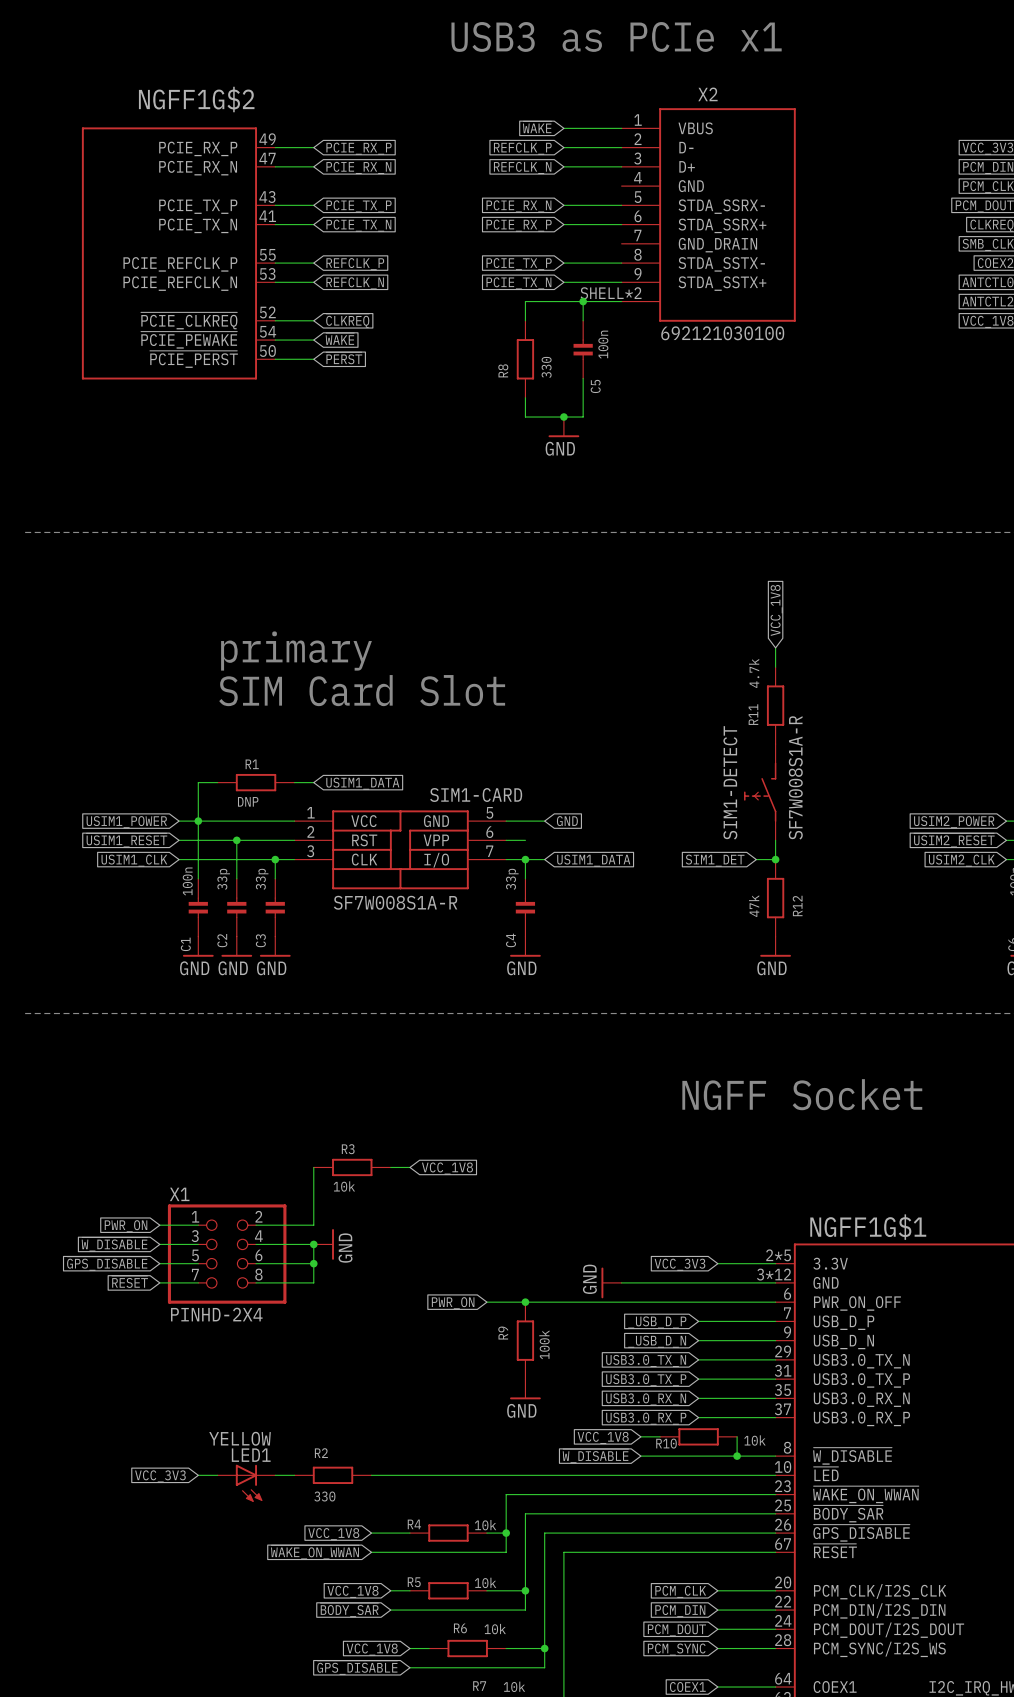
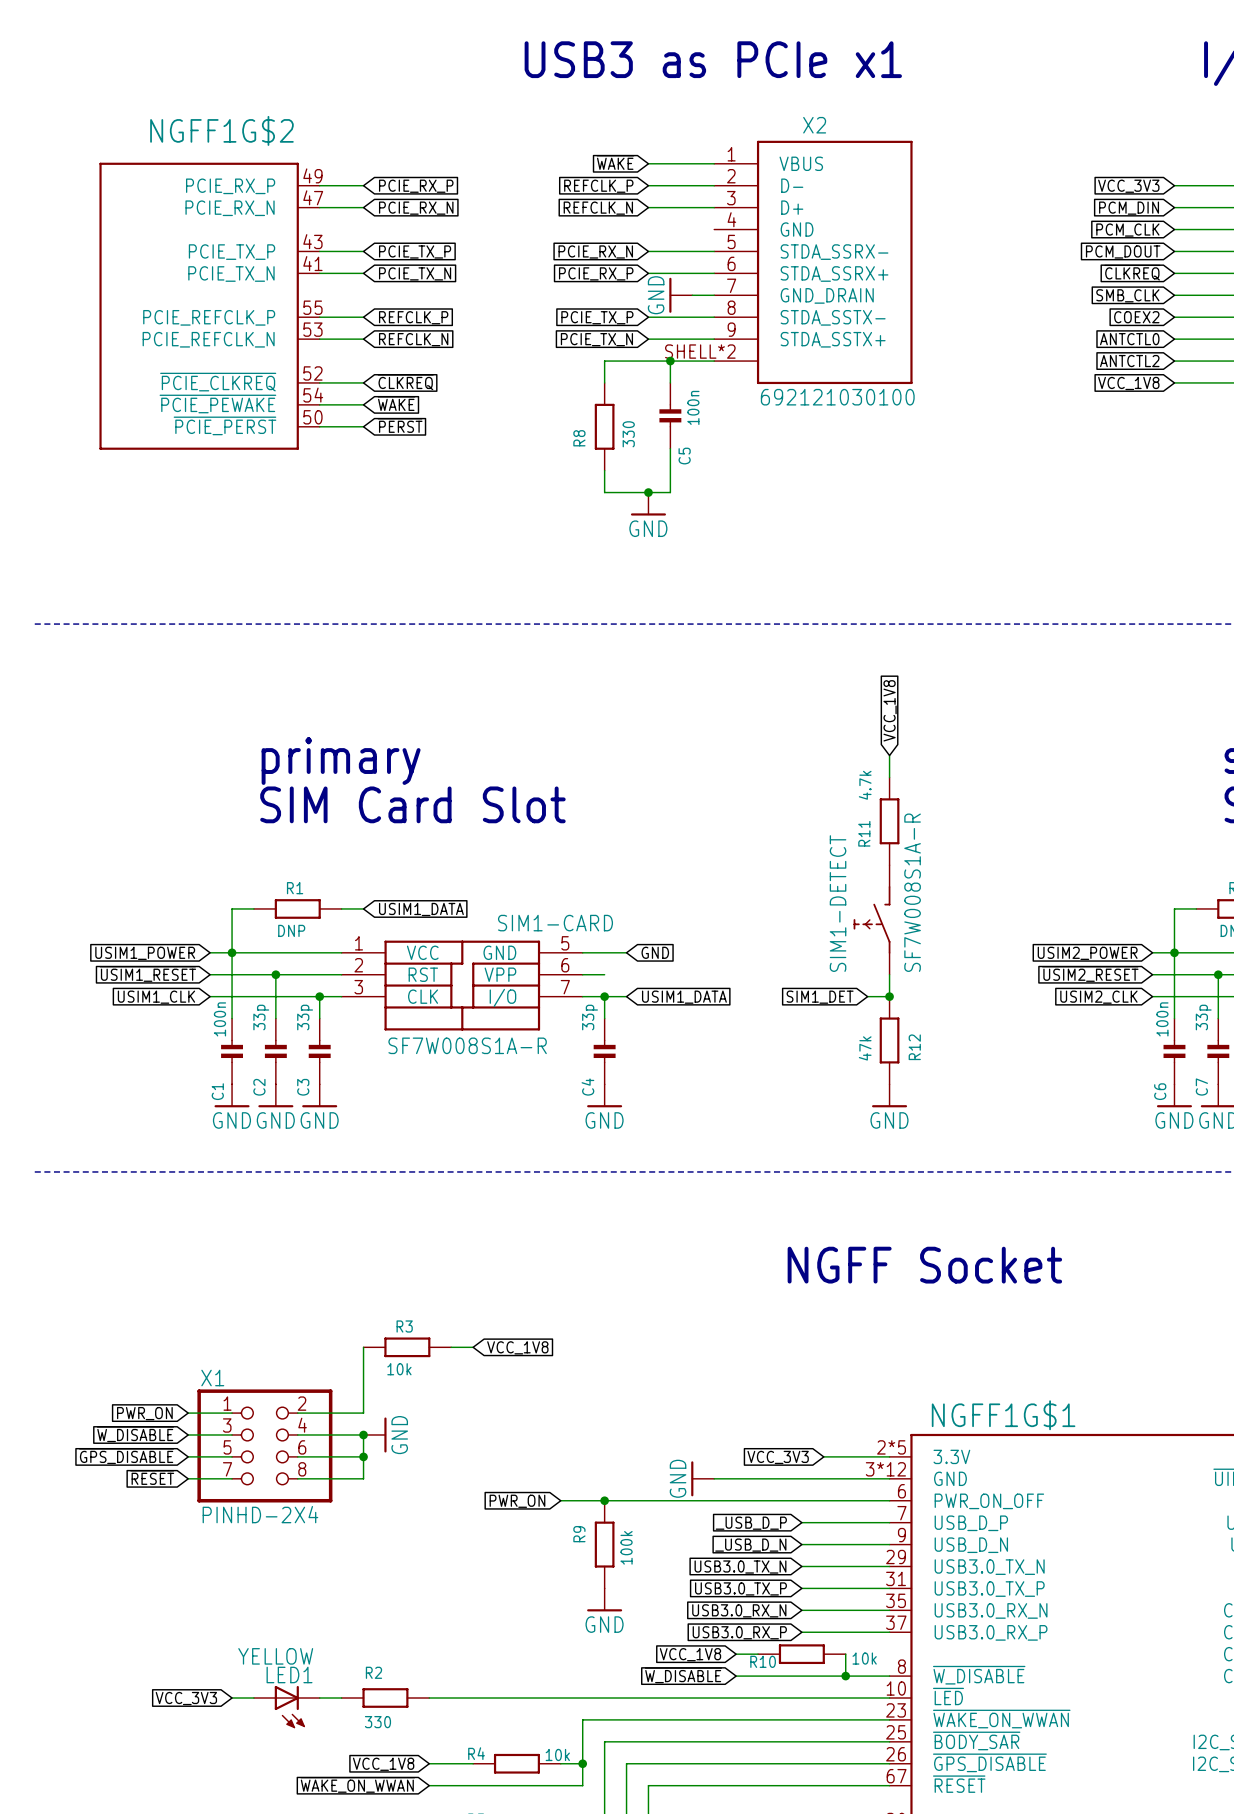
power symbol: none -> GND (680, 295)
wire: none -> (692, 295) (714, 295)

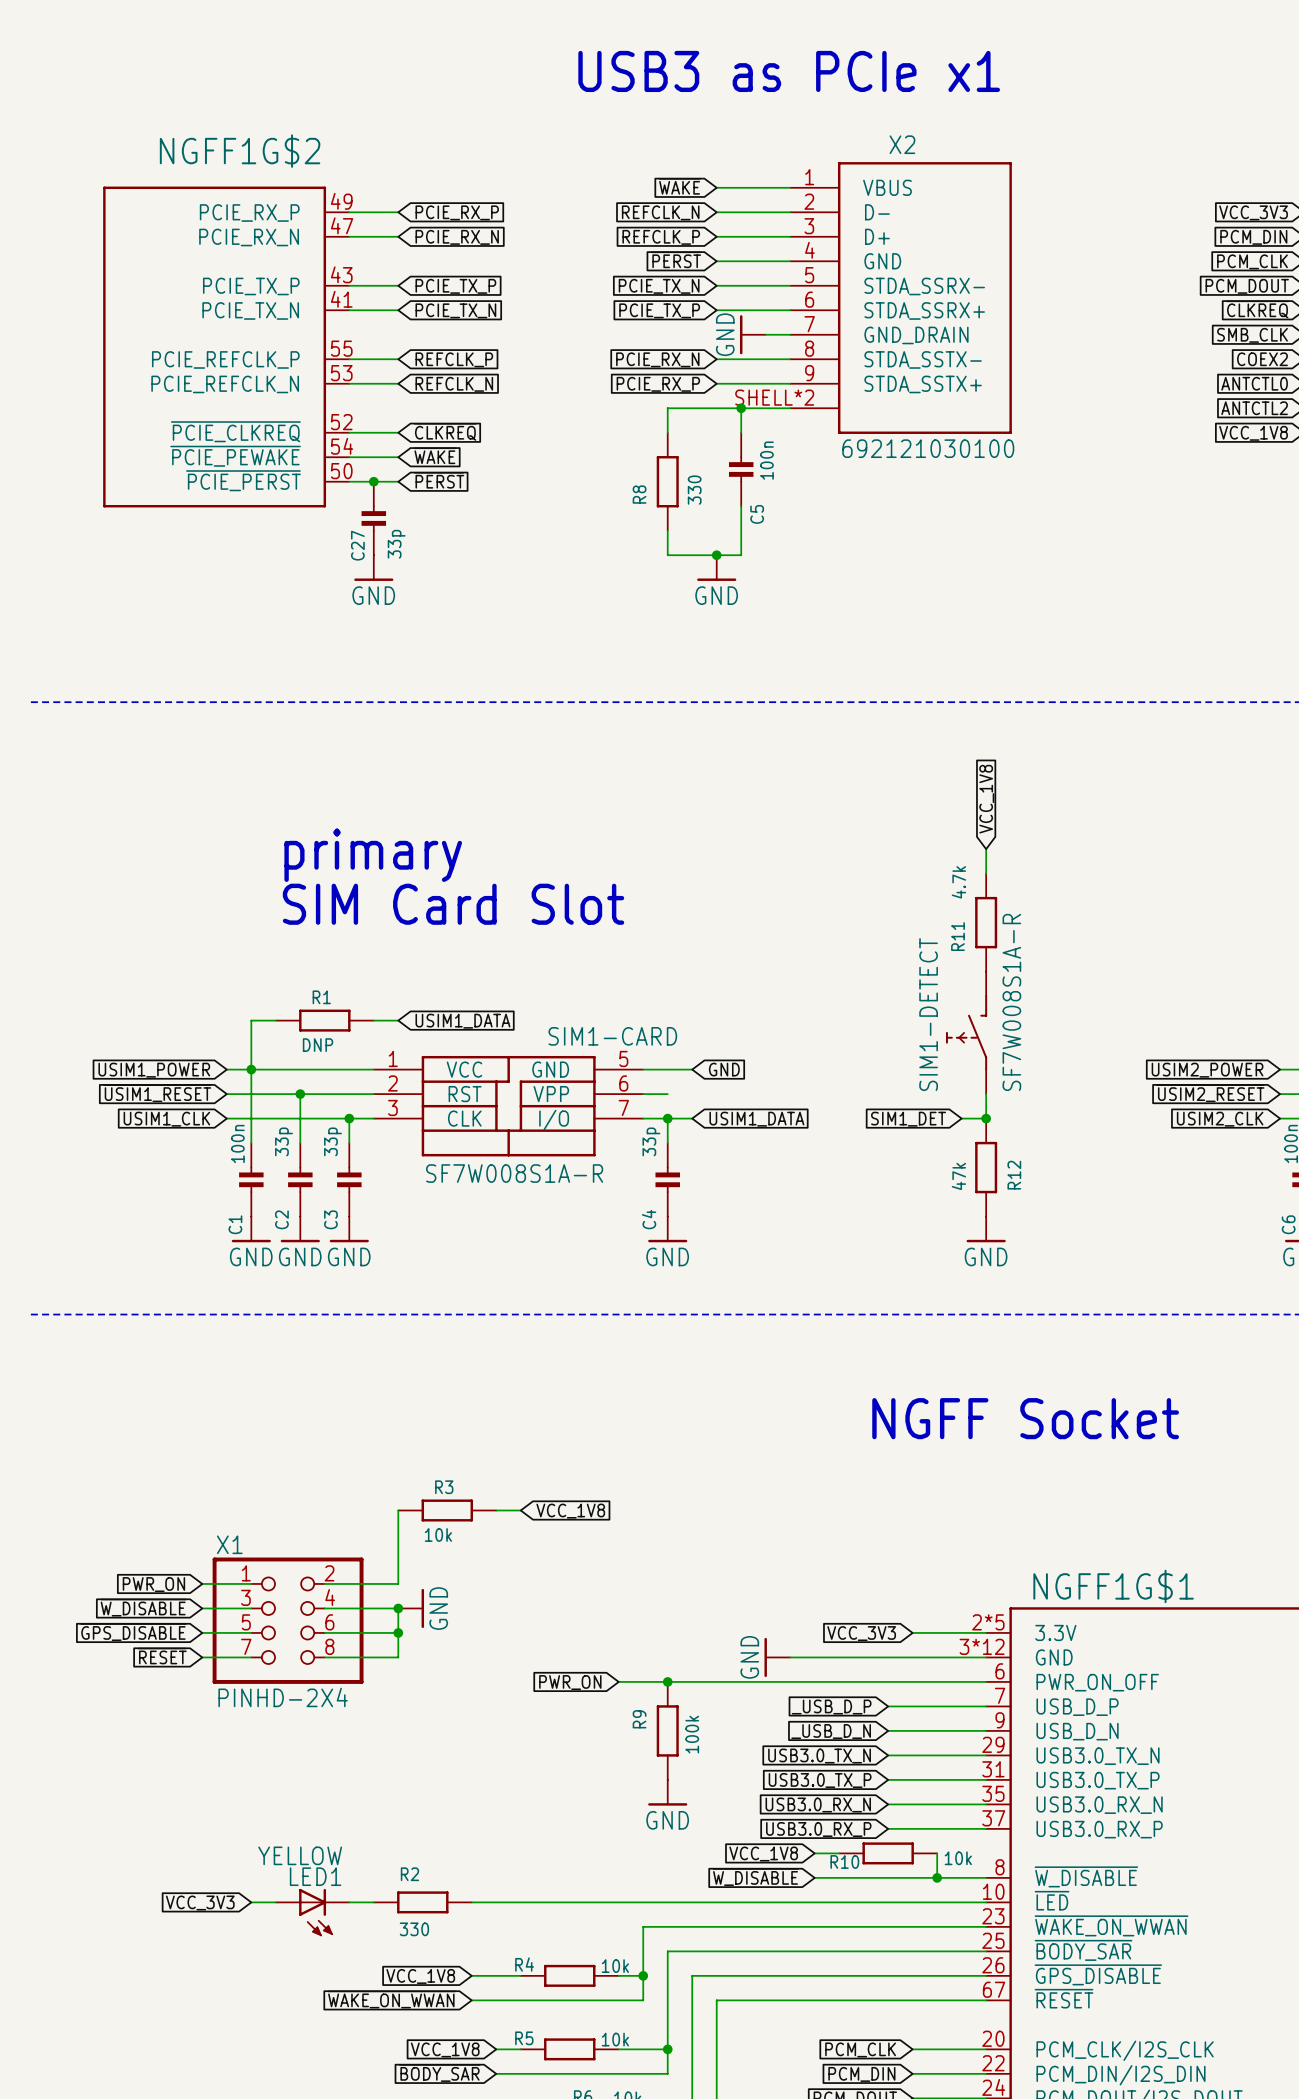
global label: REFCLK_P (598, 186) -> REFCLK_N (660, 212)
global label: REFCLK_N (598, 208) -> REFCLK_P (661, 237)
global label: none -> ~{PERST} (675, 259)
wire: none -> (716, 261) (790, 261)
global label: PCIE_RX_N (595, 251) -> PCIE_TX_N (659, 286)
global label: PCIE_RX_P (596, 273) -> PCIE_TX_P (659, 310)
global label: PCIE_TX_P (597, 317) -> PCIE_RX_N (657, 359)
global label: PCIE_TX_N (596, 339) -> PCIE_RX_P (658, 384)
junction: none -> (373, 481)
C27: none -> 33p (373, 518)
power symbol: none -> GND (373, 568)

